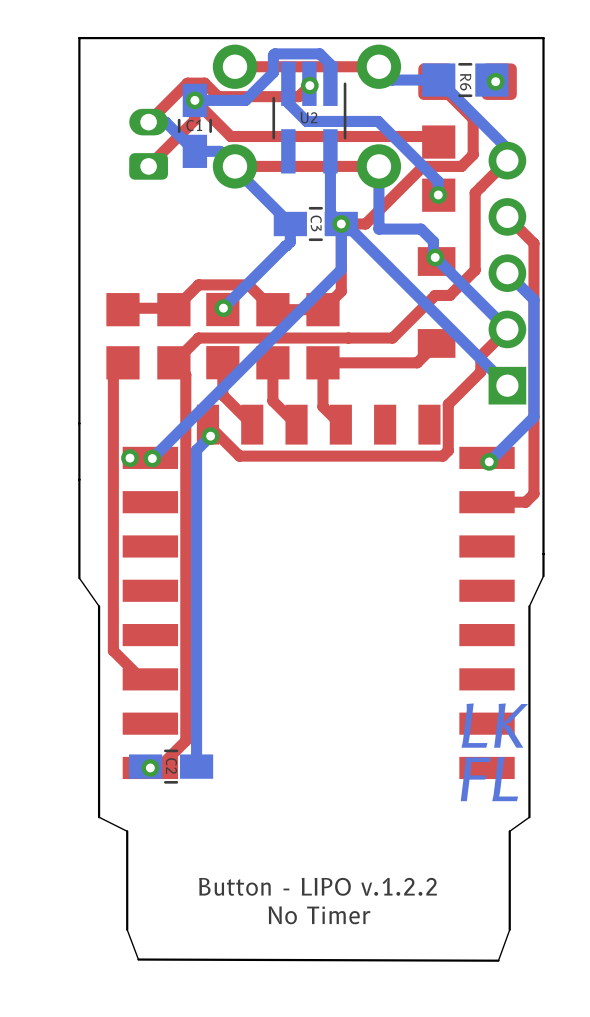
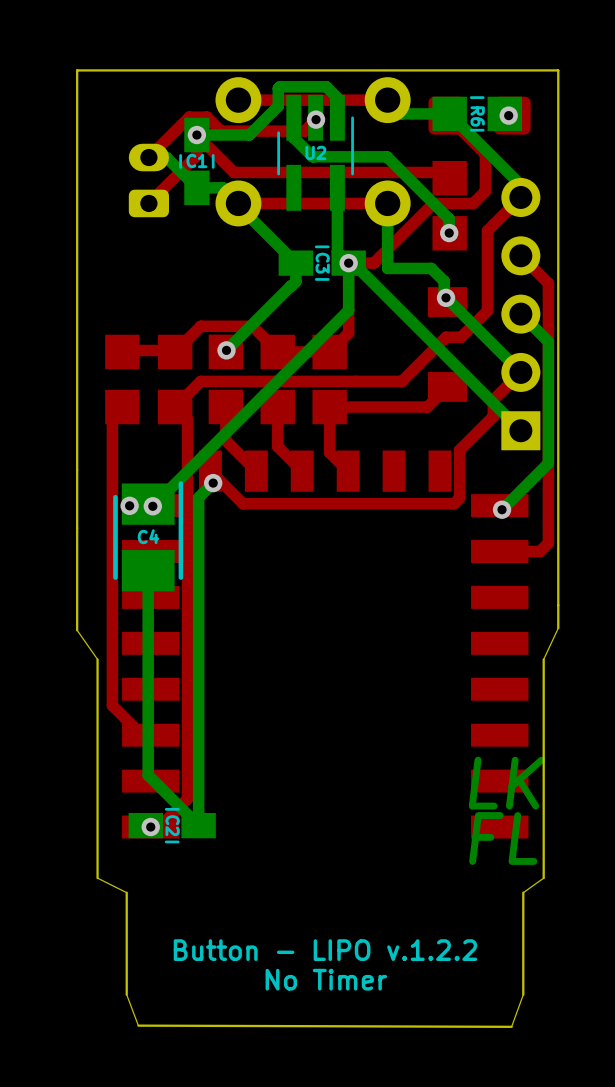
C4: none -> (148, 536)
bottom track: none -> (148, 570) (148, 775) (198, 825)

